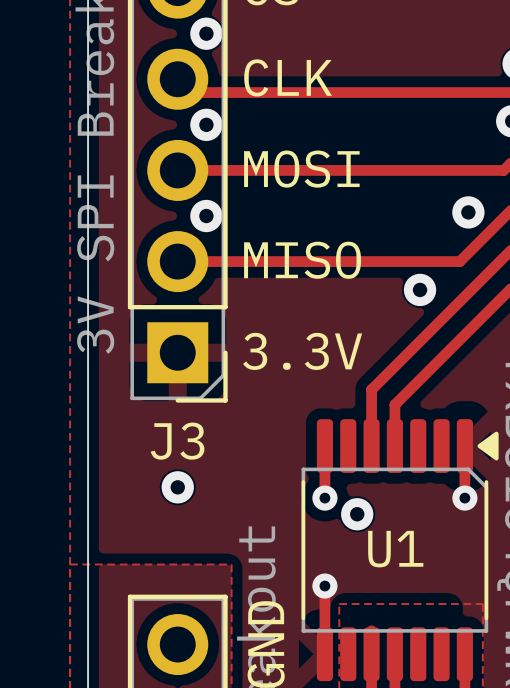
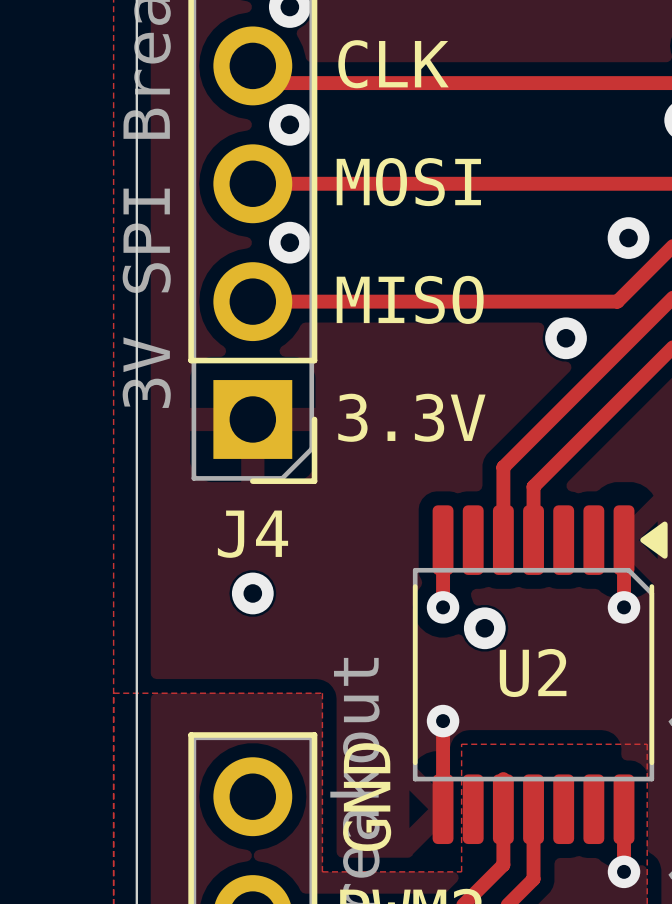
J3 name: J3 (177, 441) -> J4 (252, 534)
U1 name: U1 (395, 549) -> U2 (533, 672)

